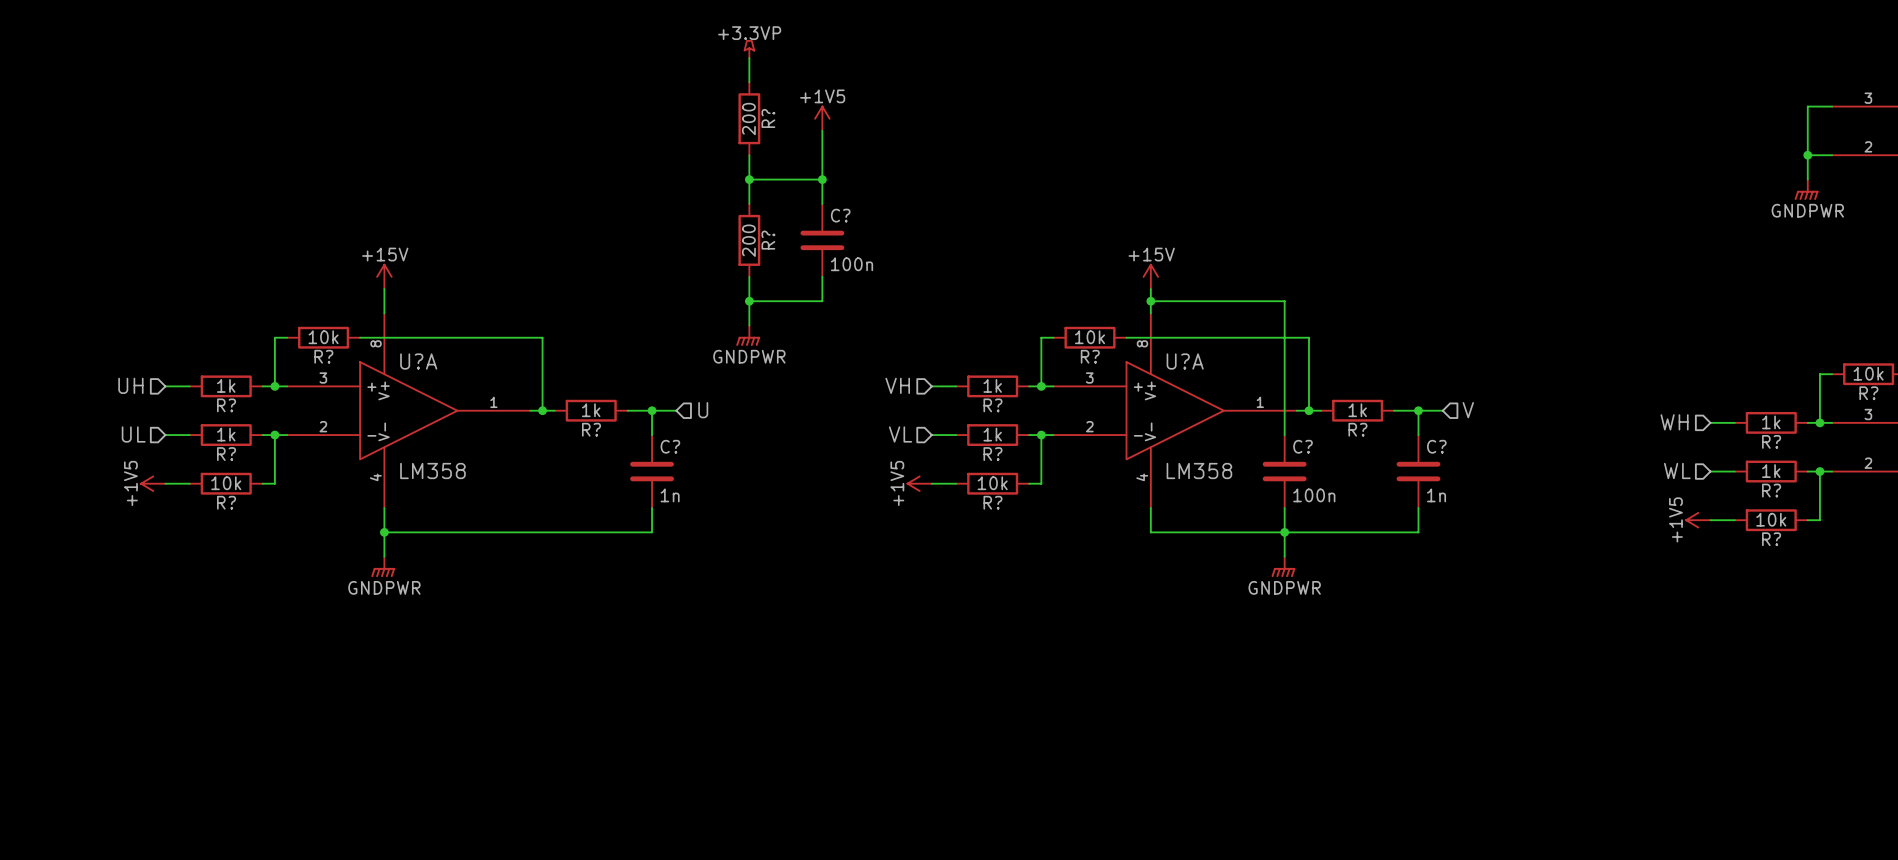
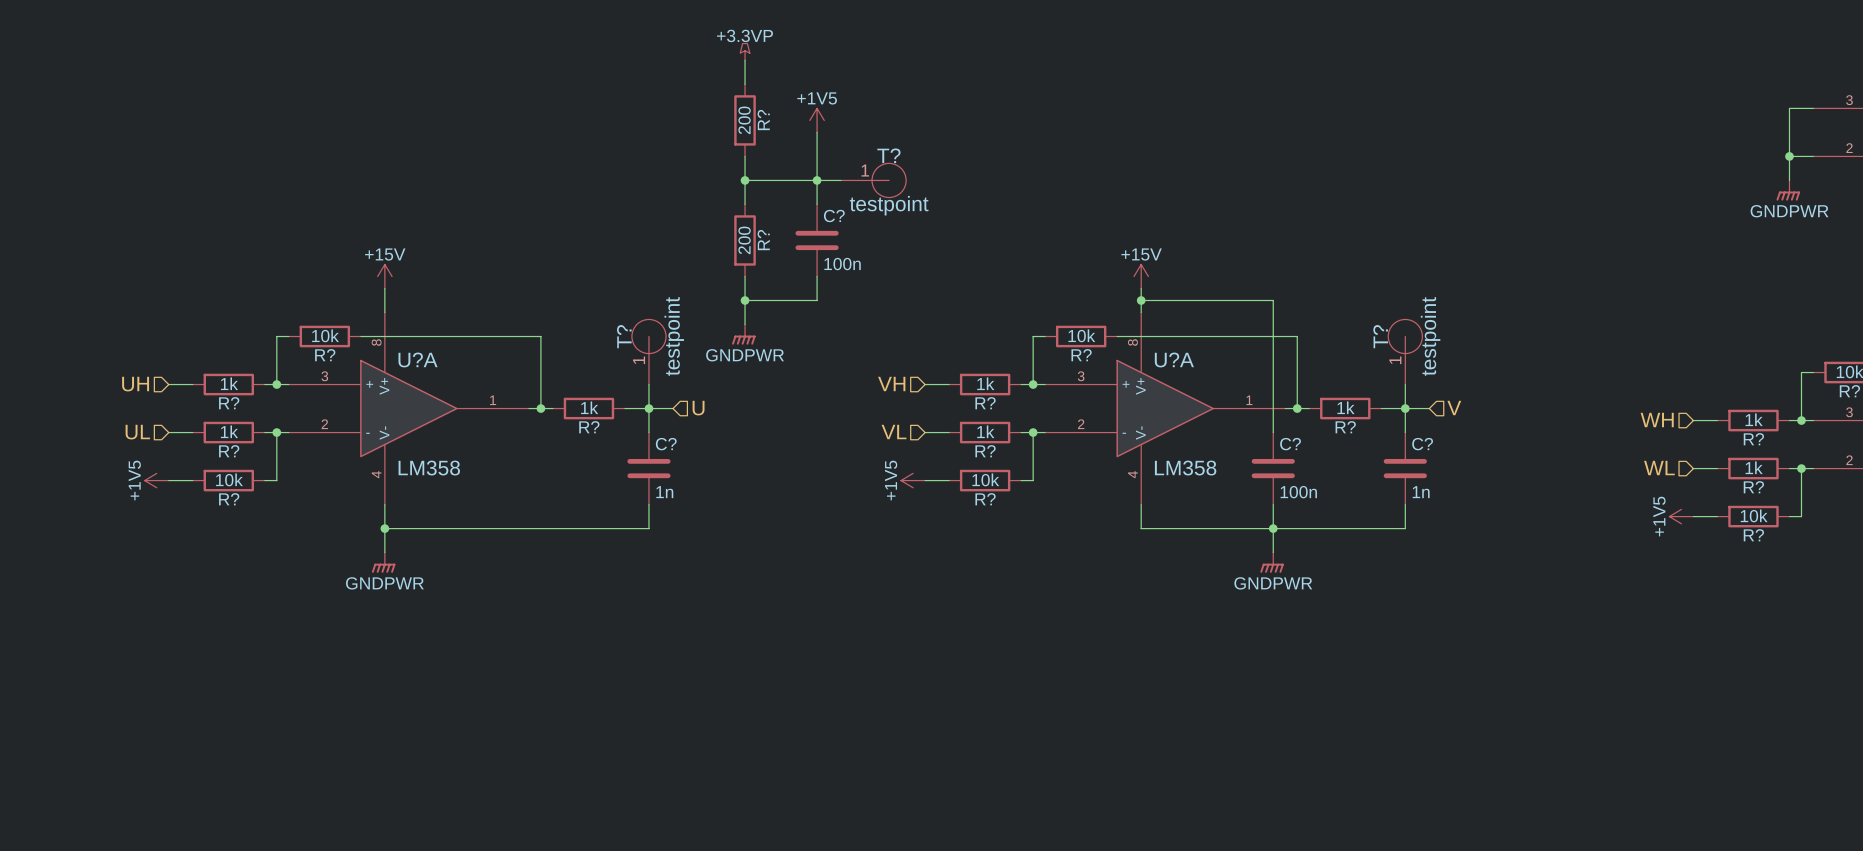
wire: none -> (817, 180) (841, 180)
T?: none -> testpoint (873, 180)
T?: none -> testpoint (648, 352)
T?: none -> testpoint (1405, 352)
wire: none -> (648, 384) (648, 408)
wire: none -> (1405, 384) (1405, 408)

